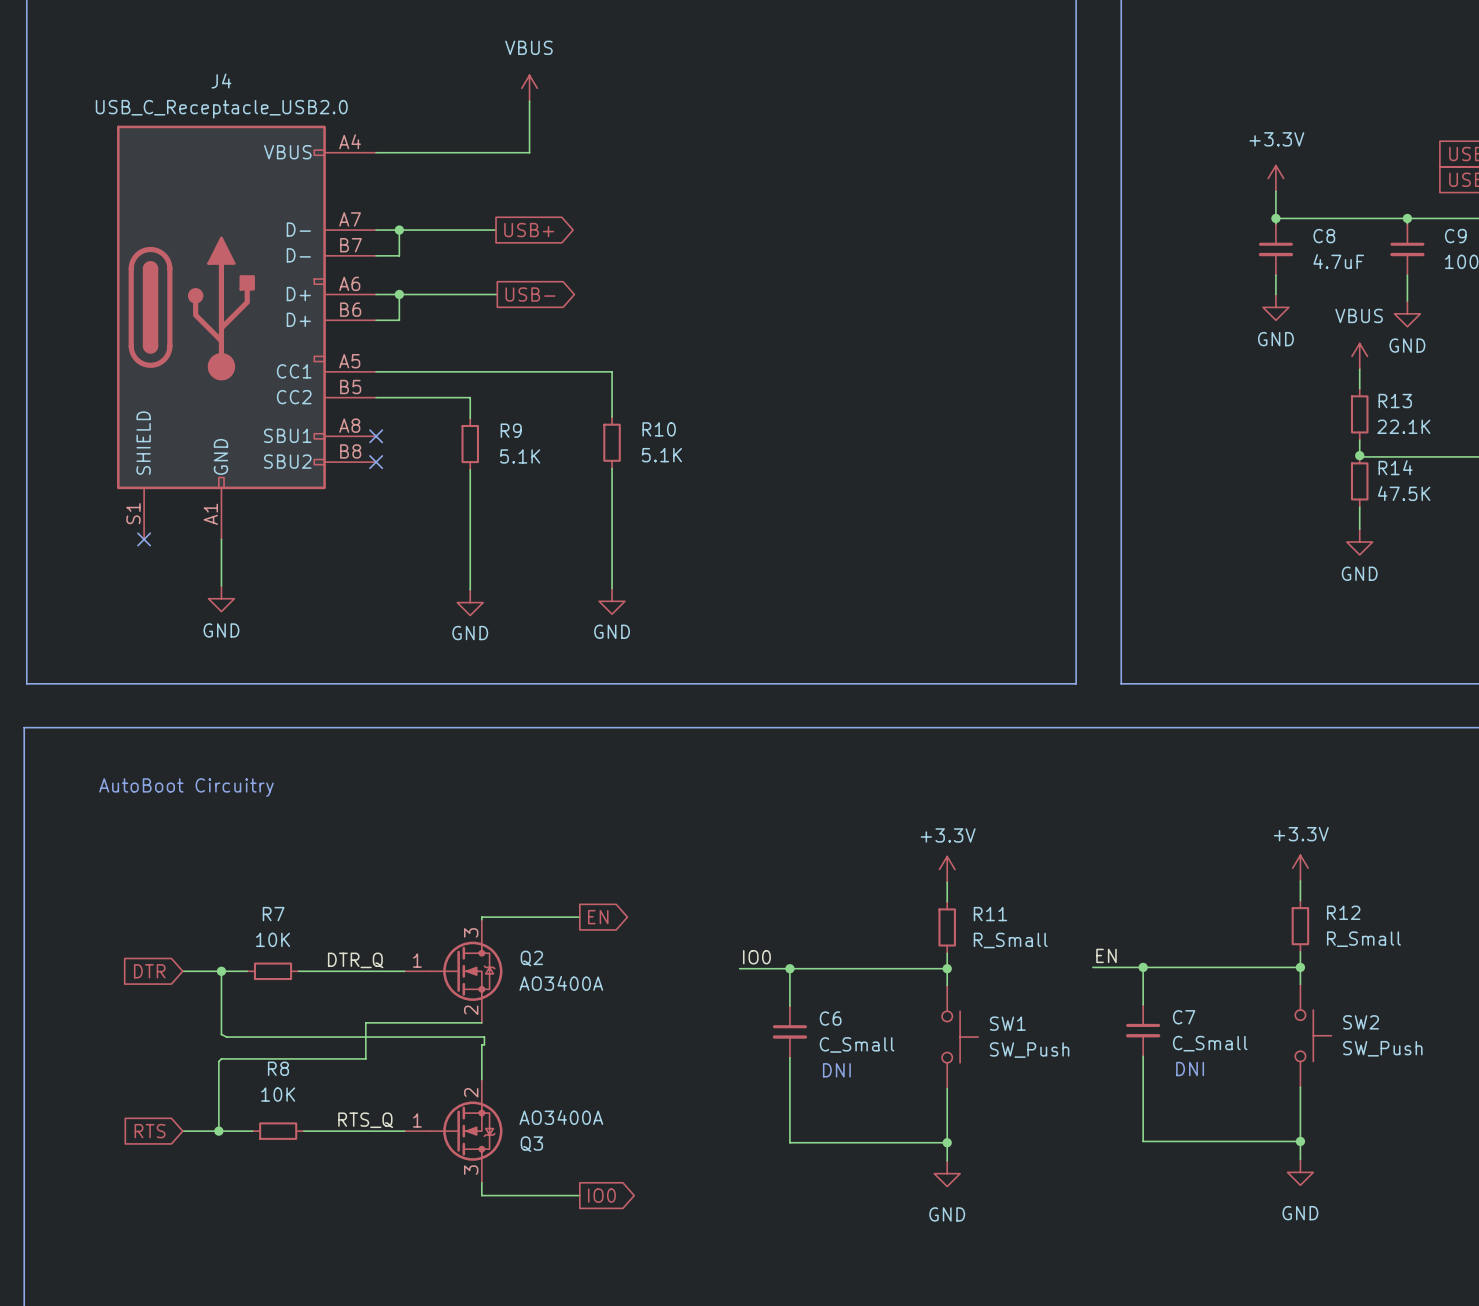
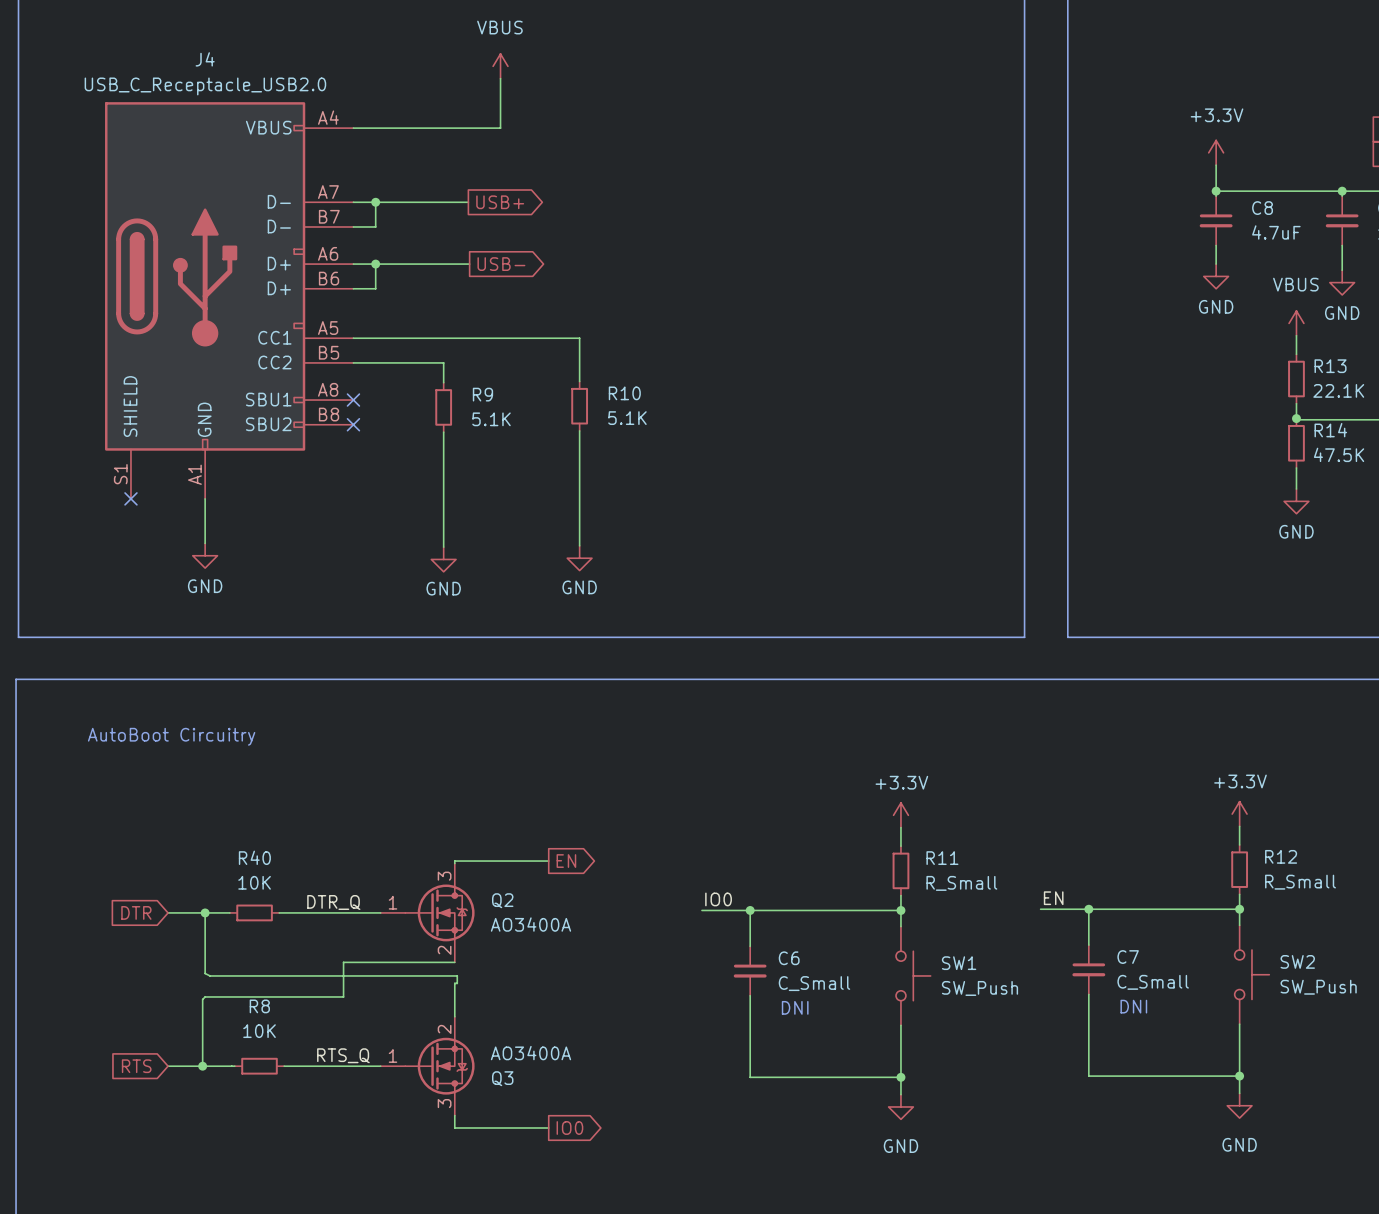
R7 name: R7 (273, 914) -> R40 (254, 857)

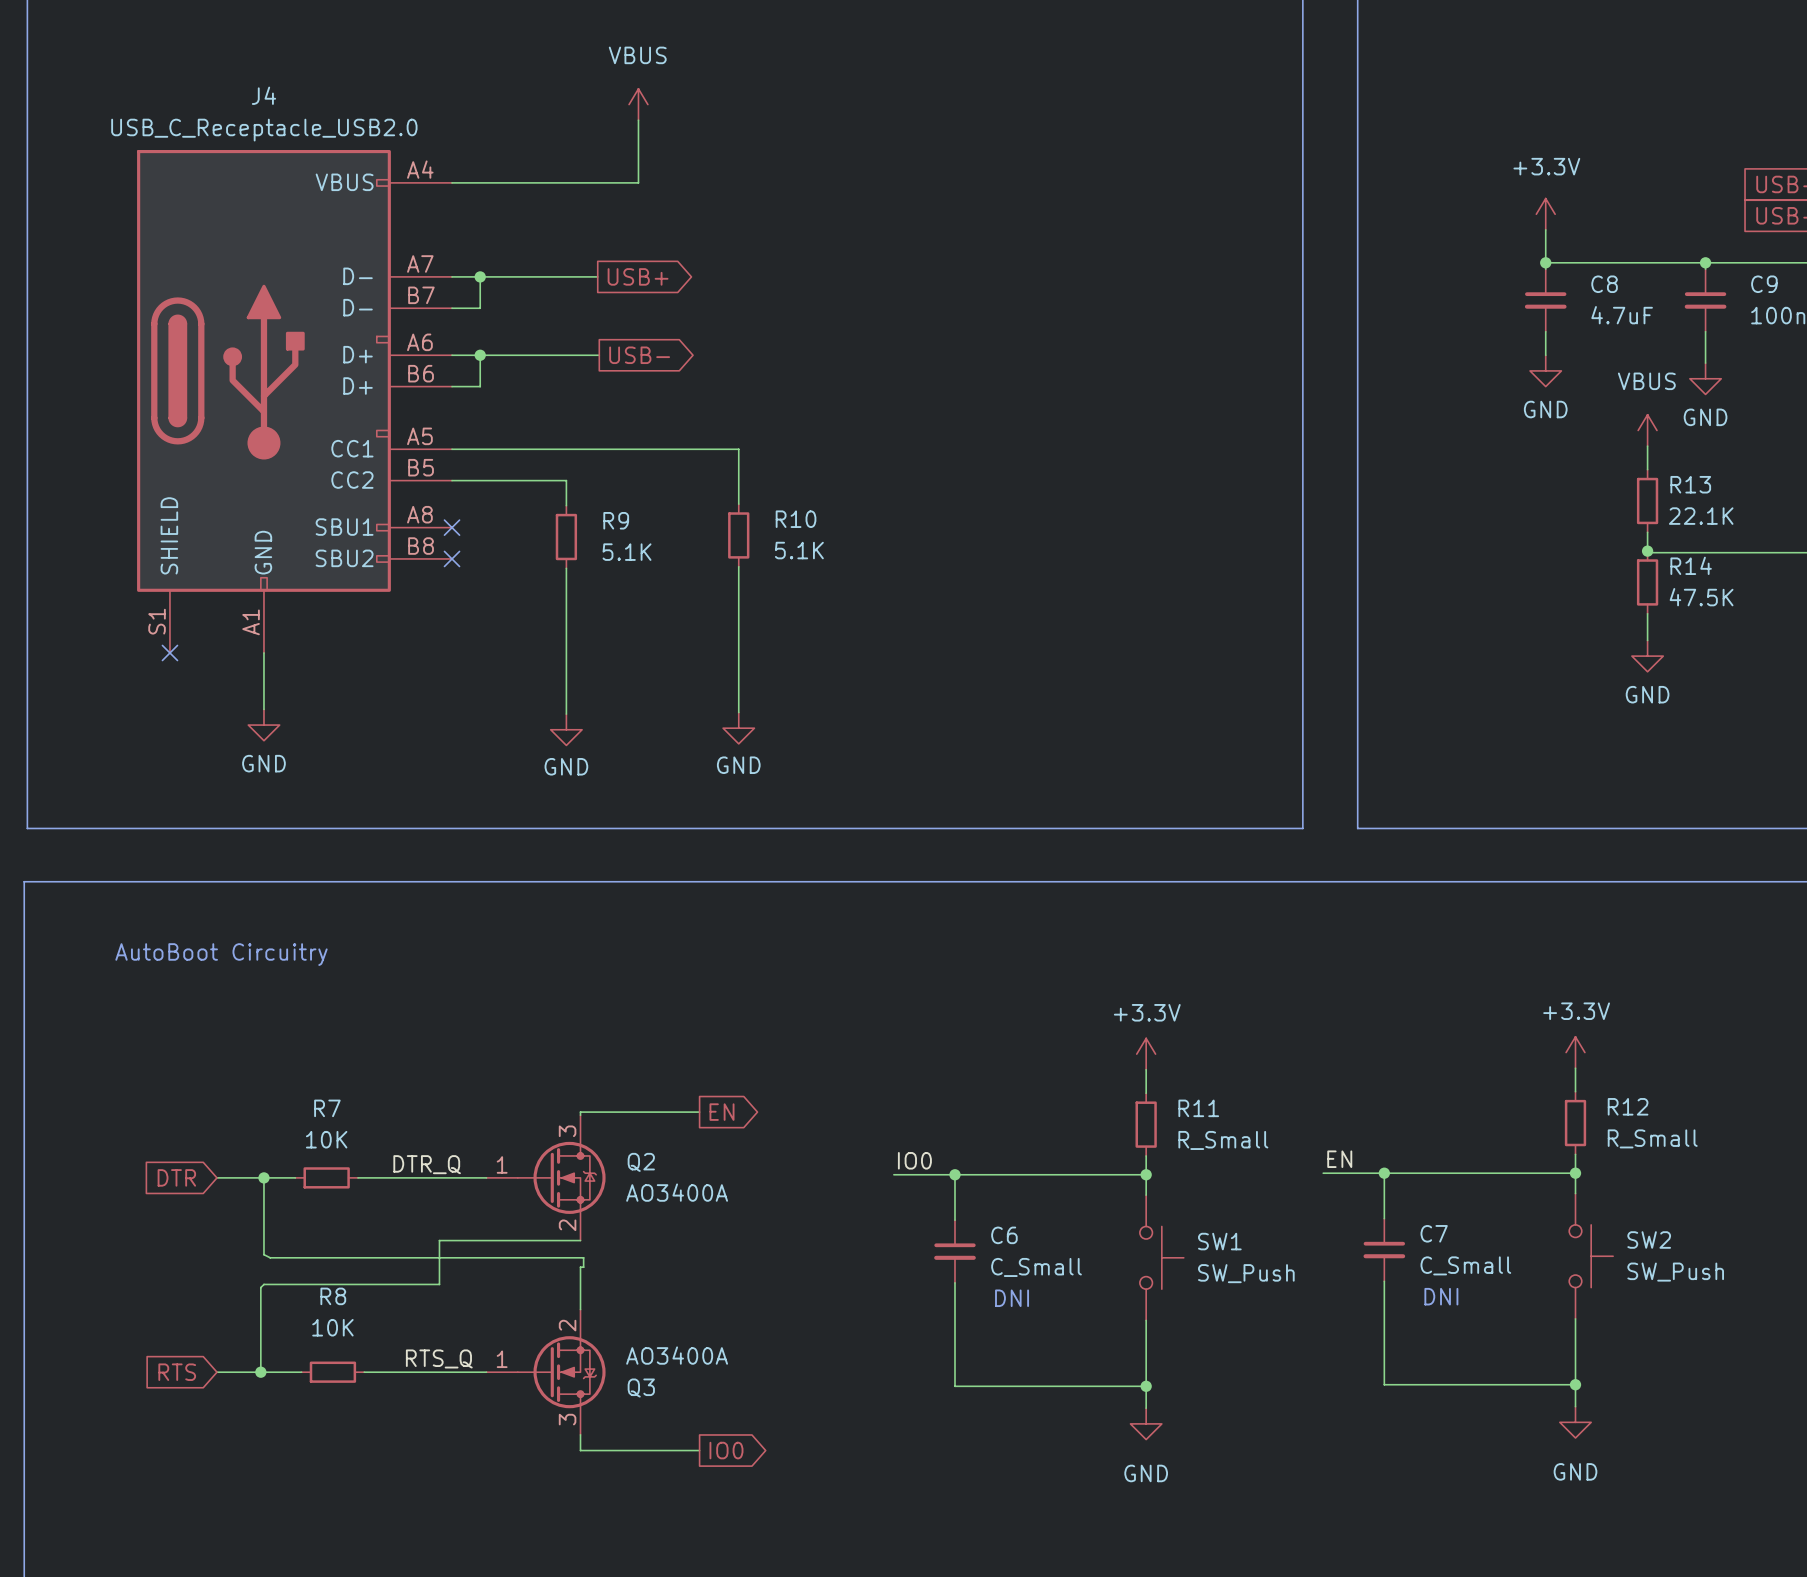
R40 name: R40 (254, 857) -> R7 (327, 1108)

